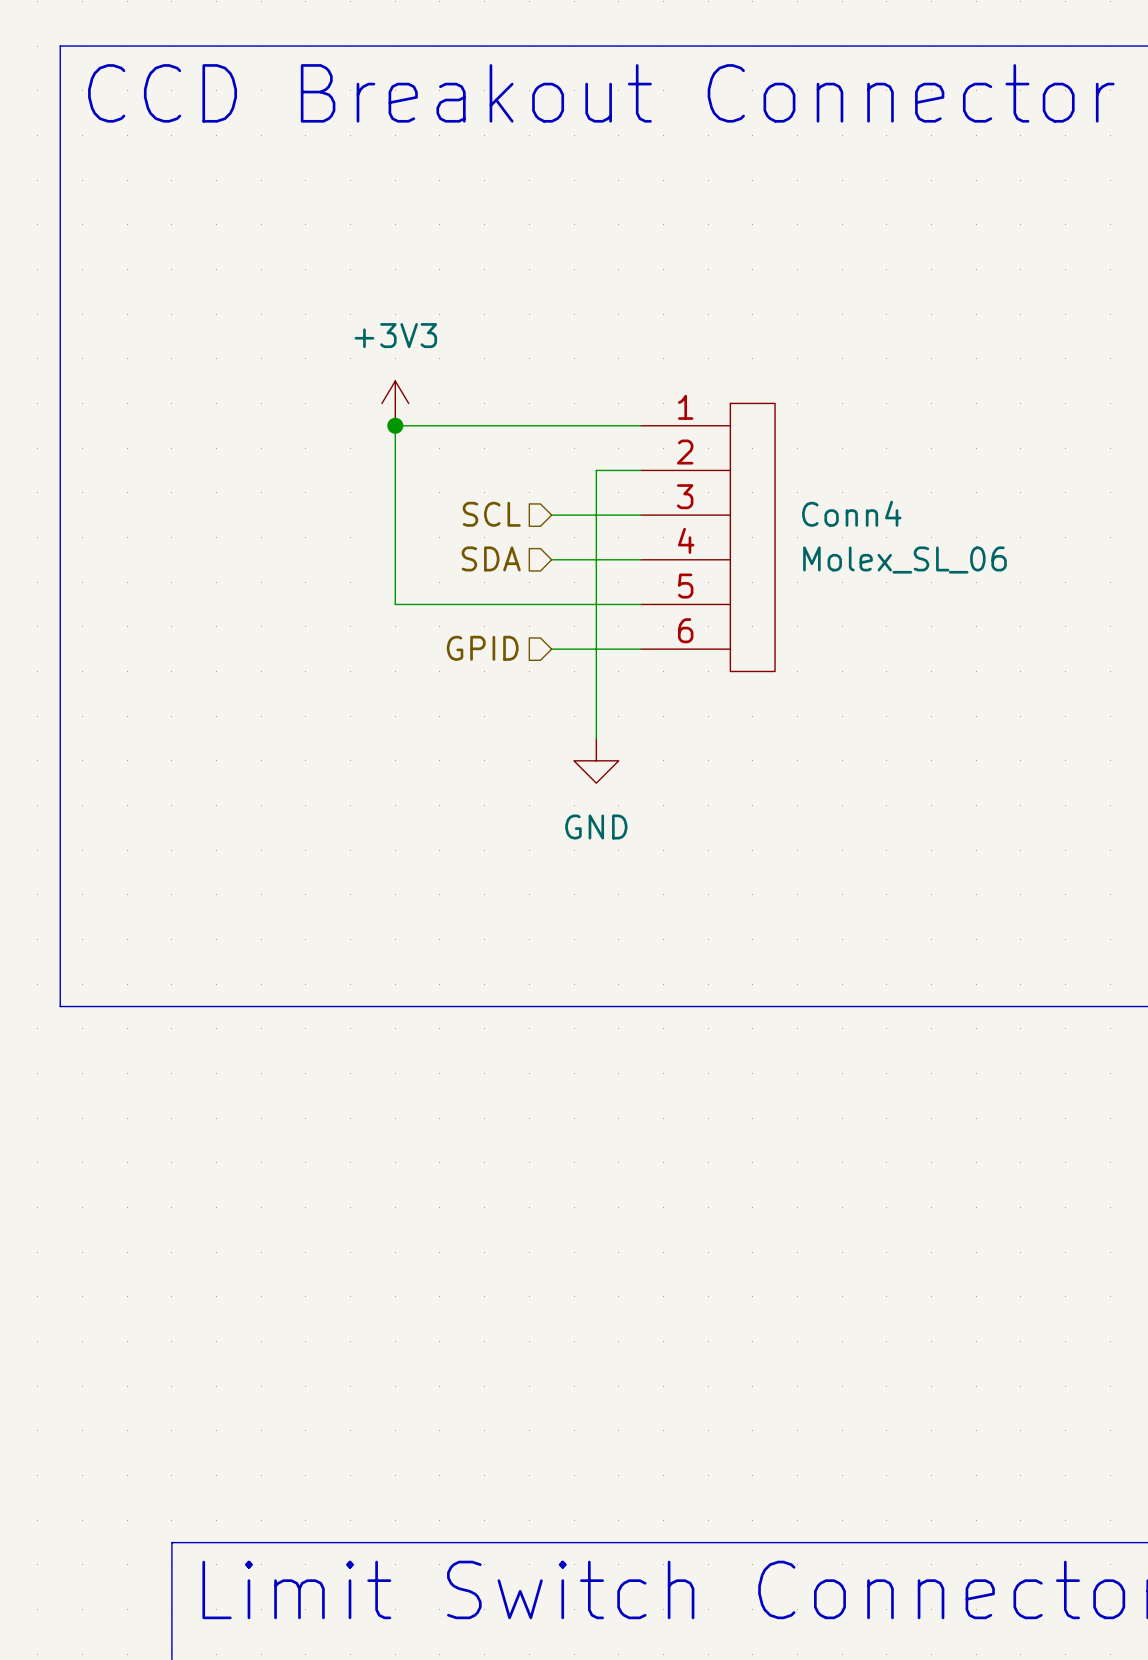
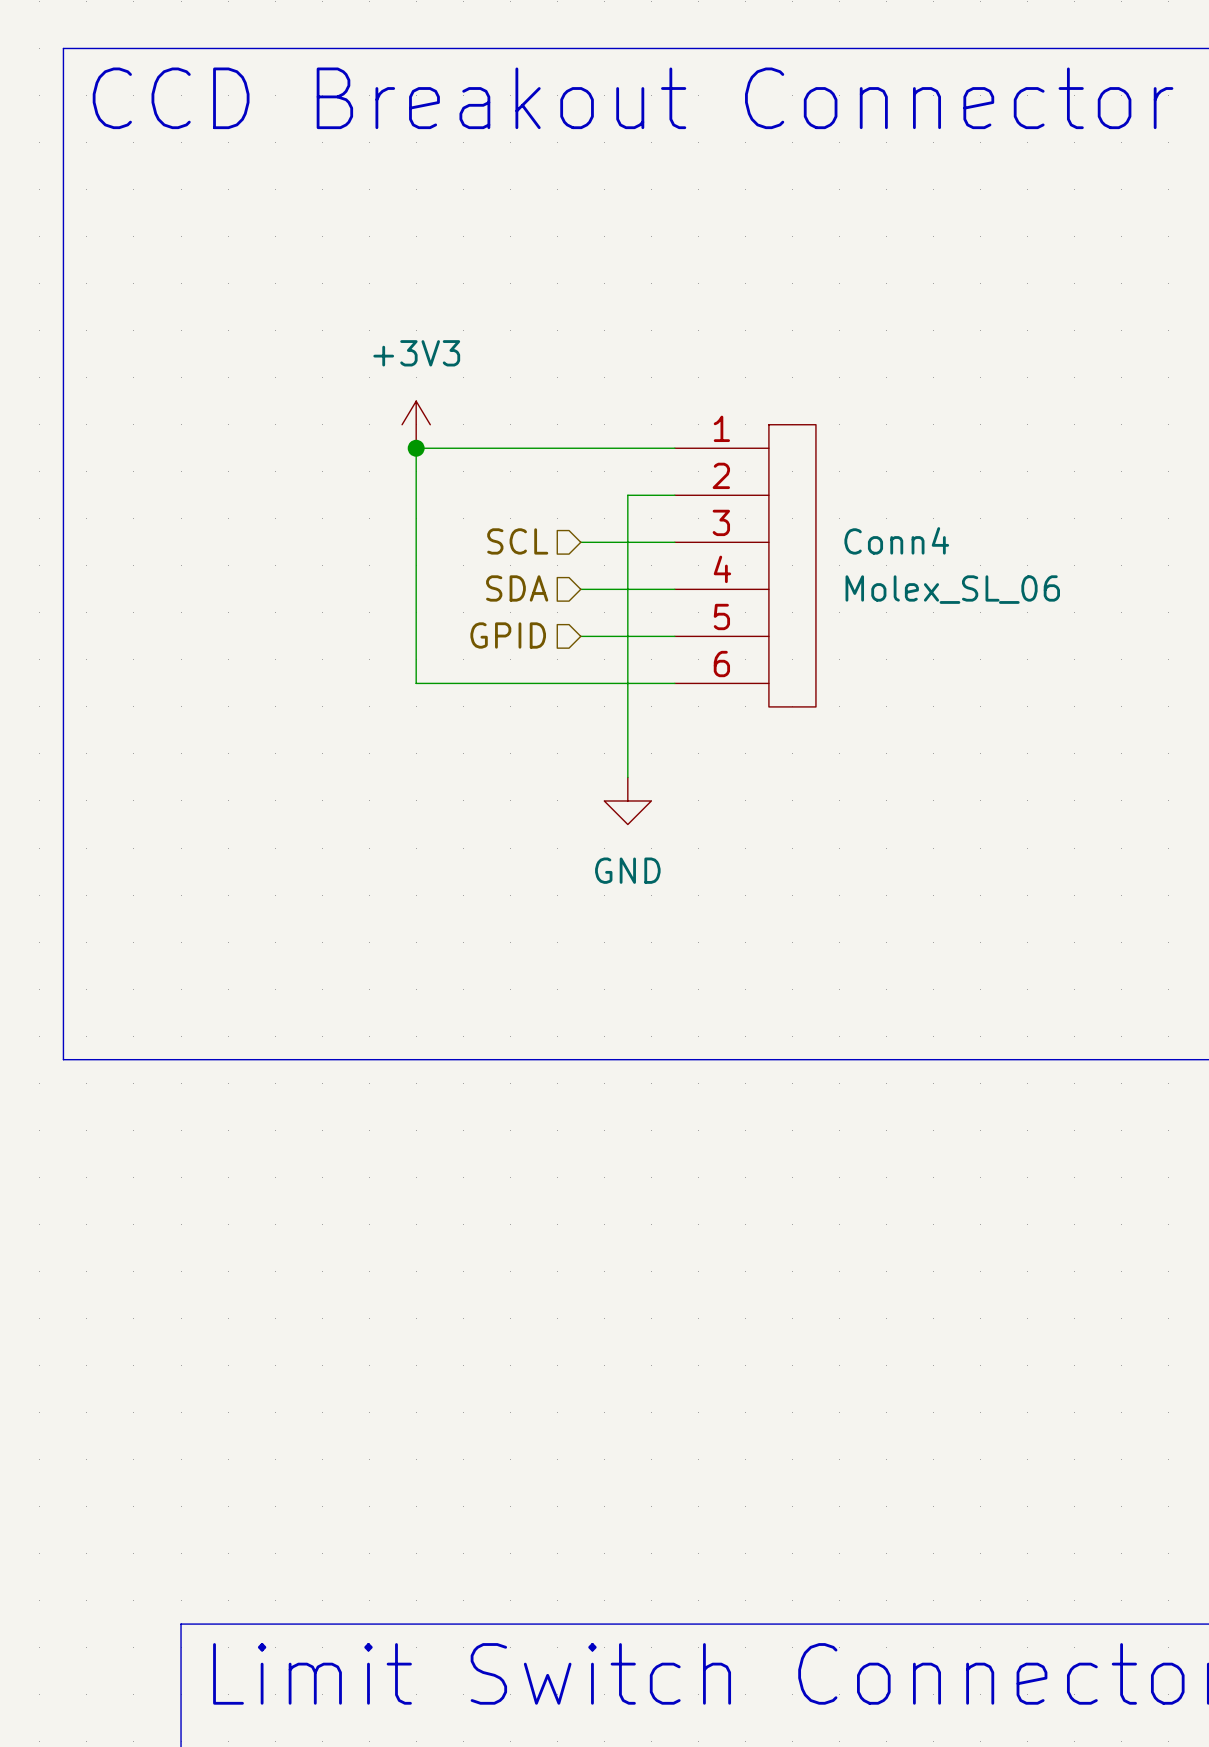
wire: (395, 604) (551, 604) -> (416, 636) (416, 683) (580, 683)
hierarchical label position: GPID (482, 648) -> GPID (508, 635)

